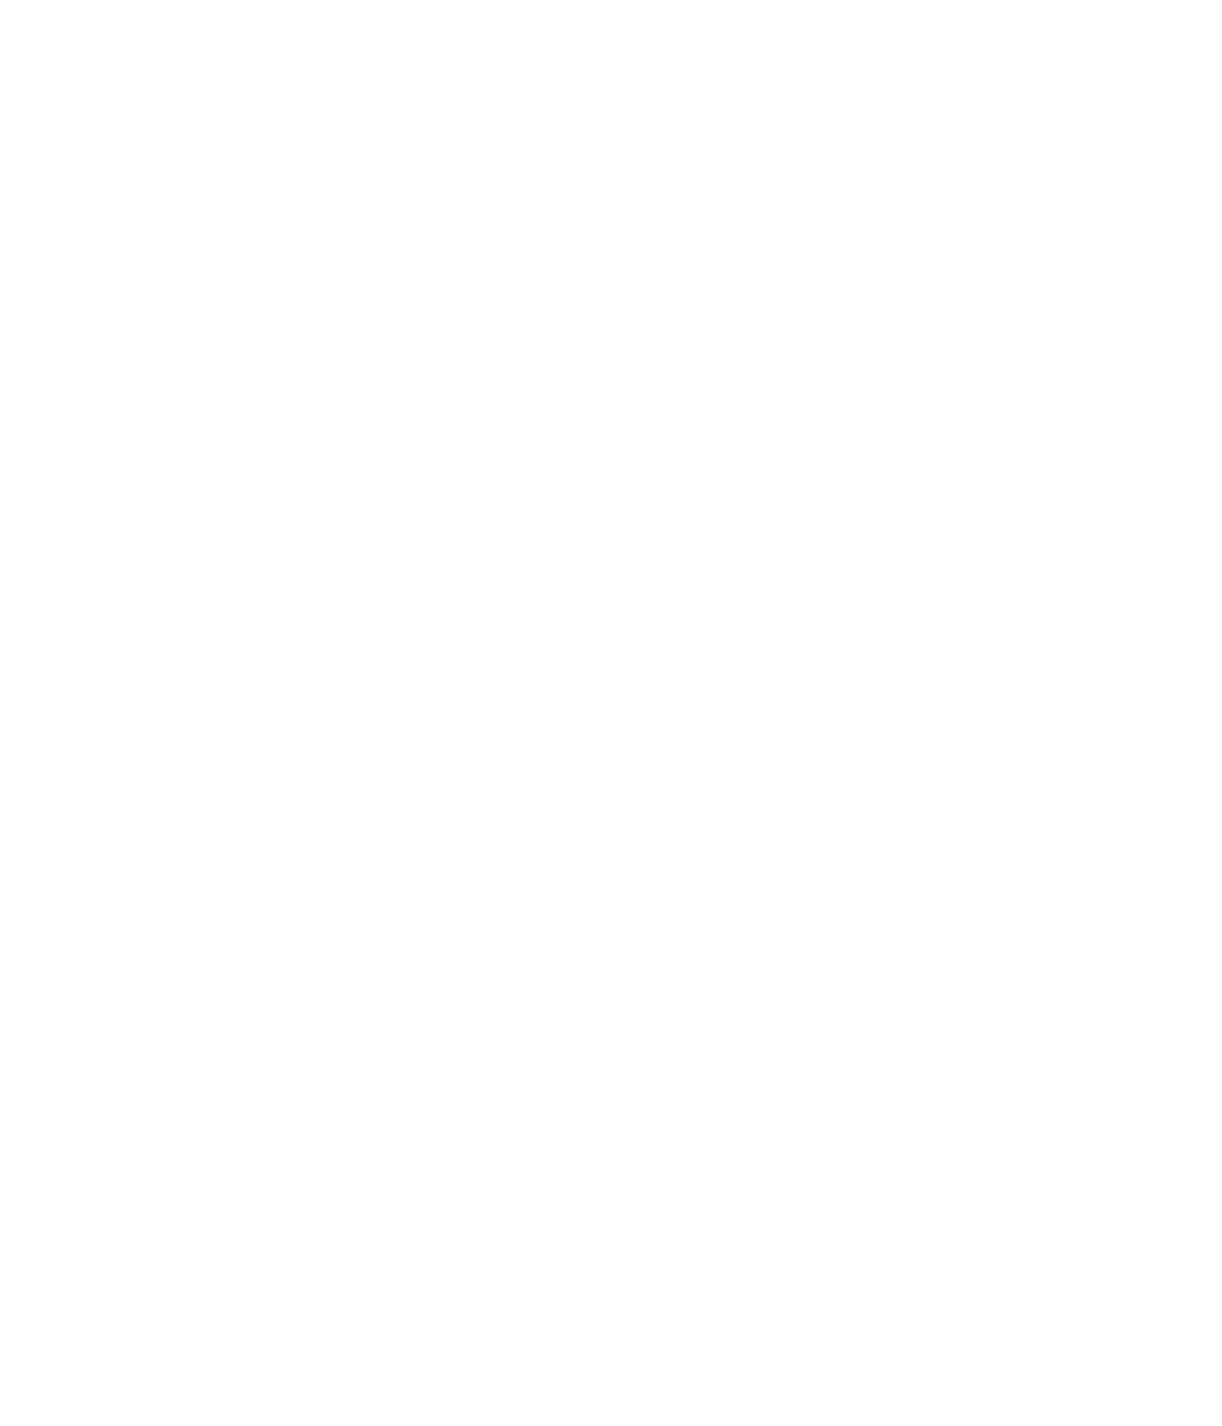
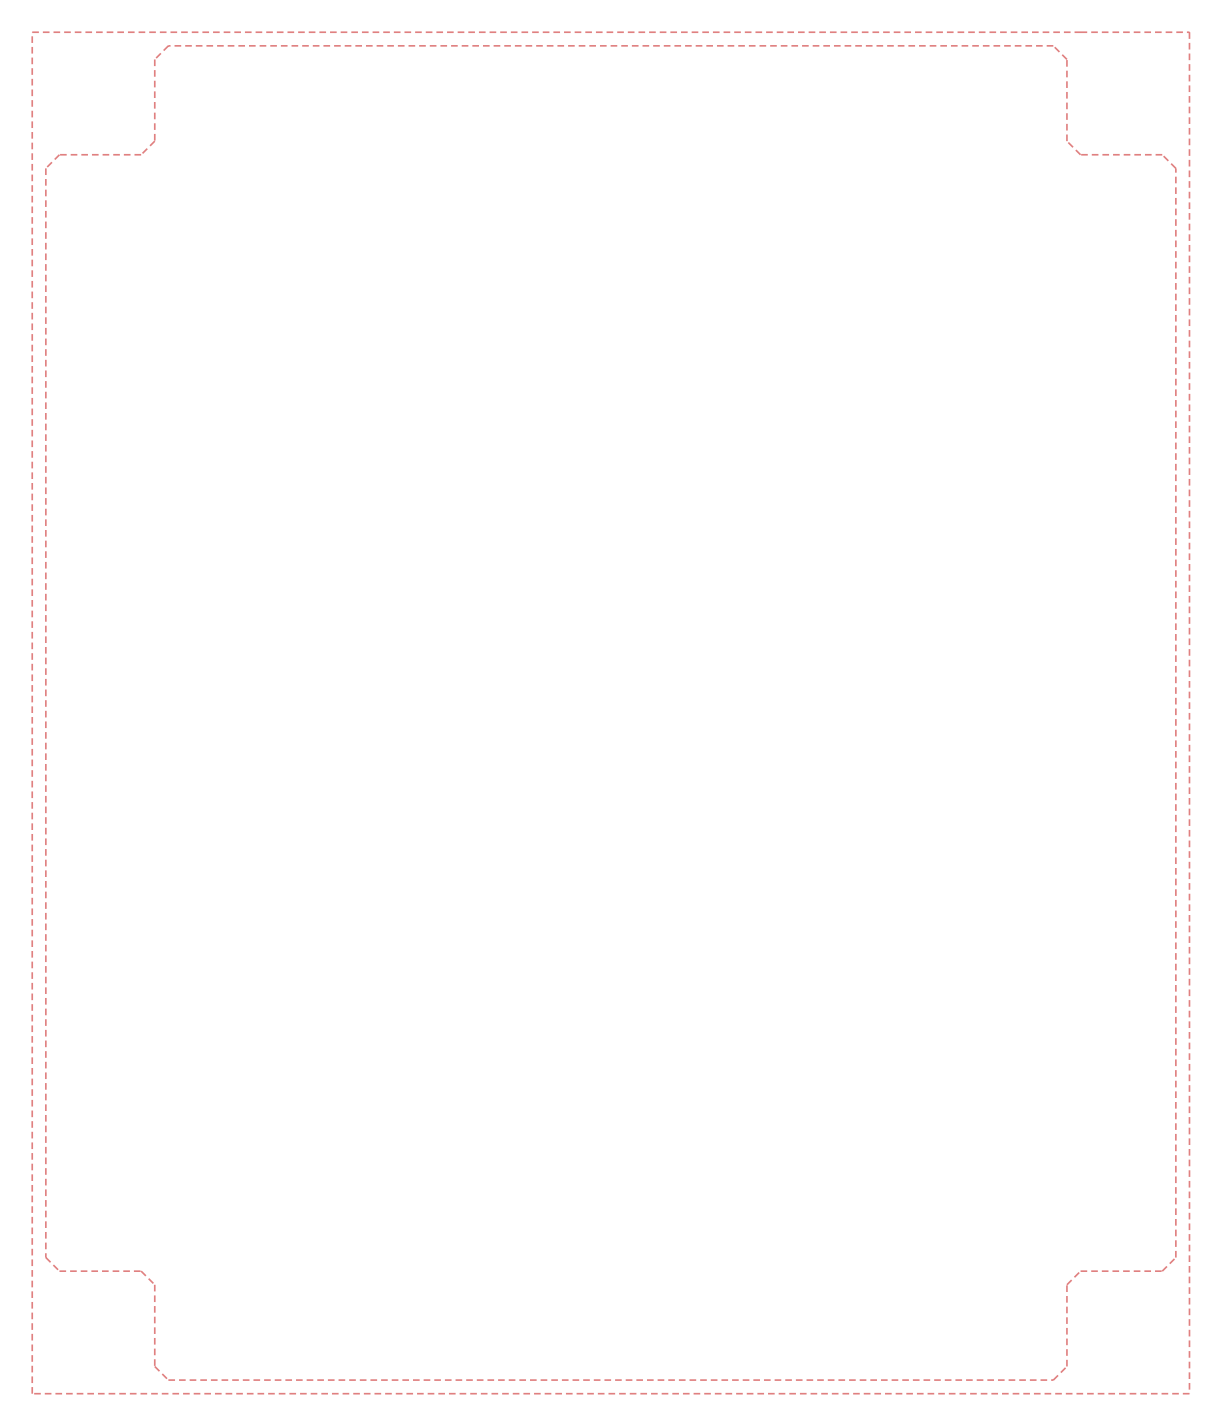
zone outline: none -> (32, 32) (32, 1393) (1189, 1393) (1189, 32) (32, 32)
zone outline: none -> (168, 45) (1053, 45) (1066, 59) (1066, 141) (1080, 154) (1162, 154) (1175, 168) (1175, 1257) (1162, 1271) (1080, 1271) (1066, 1284) (1066, 1366) (1053, 1380) (168, 1380) (154, 1366) (154, 1284) (141, 1271) (59, 1271) (45, 1257) (45, 168) (59, 154) (141, 154) (154, 141) (154, 59) (168, 45)

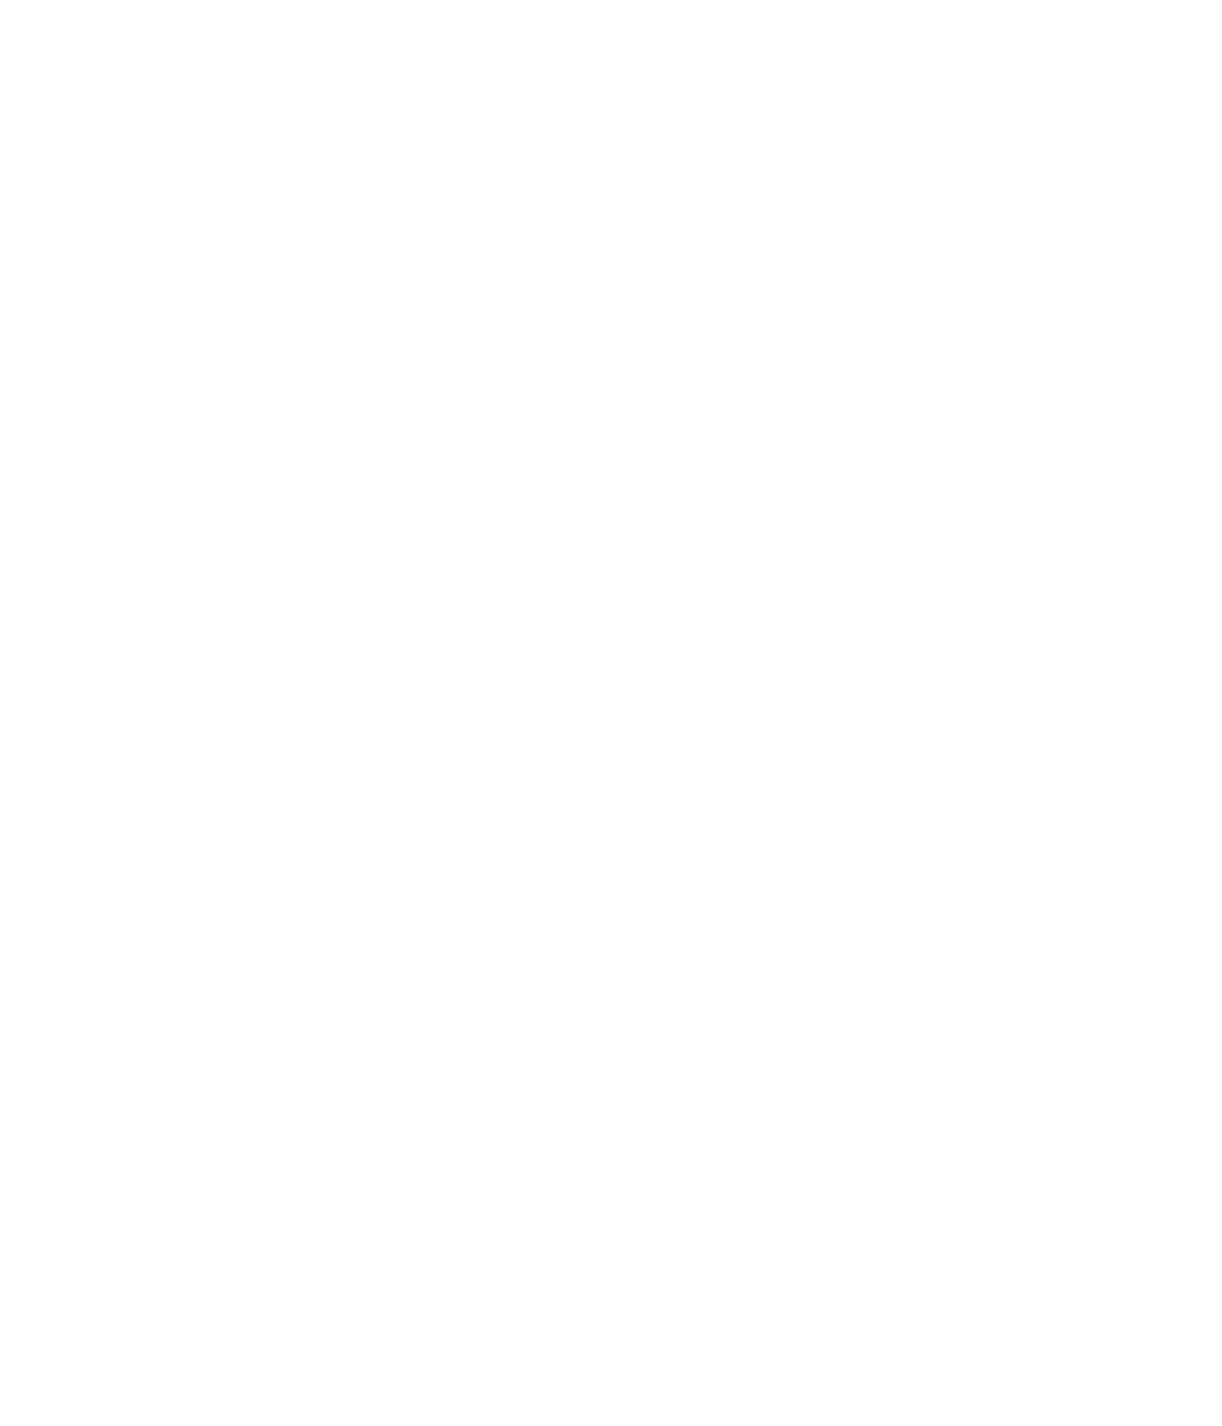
zone outline: (32, 32) (32, 1393) (1189, 1393) (1189, 32) (32, 32) -> none
zone outline: (168, 45) (1053, 45) (1066, 59) (1066, 141) (1080, 154) (1162, 154) (1175, 168) (1175, 1257) (1162, 1271) (1080, 1271) (1066, 1284) (1066, 1366) (1053, 1380) (168, 1380) (154, 1366) (154, 1284) (141, 1271) (59, 1271) (45, 1257) (45, 168) (59, 154) (141, 154) (154, 141) (154, 59) (168, 45) -> none

